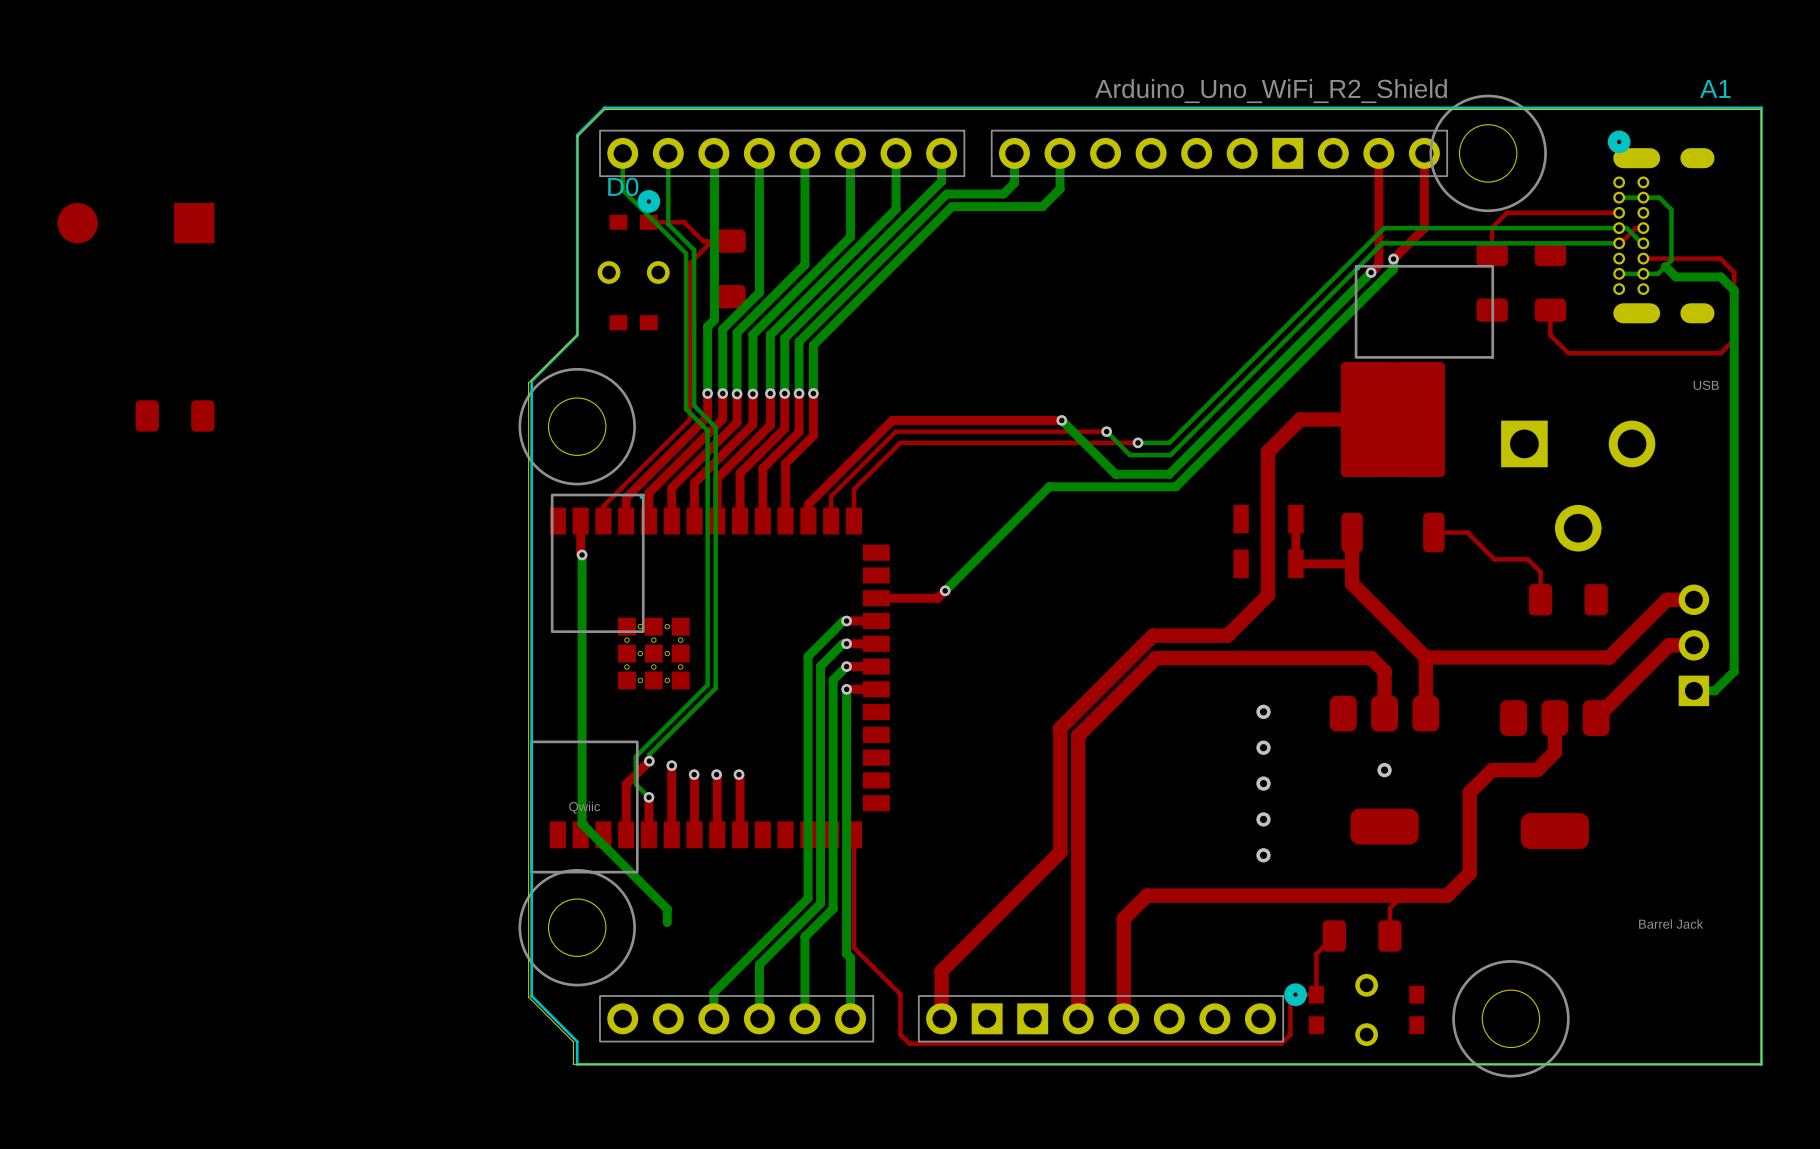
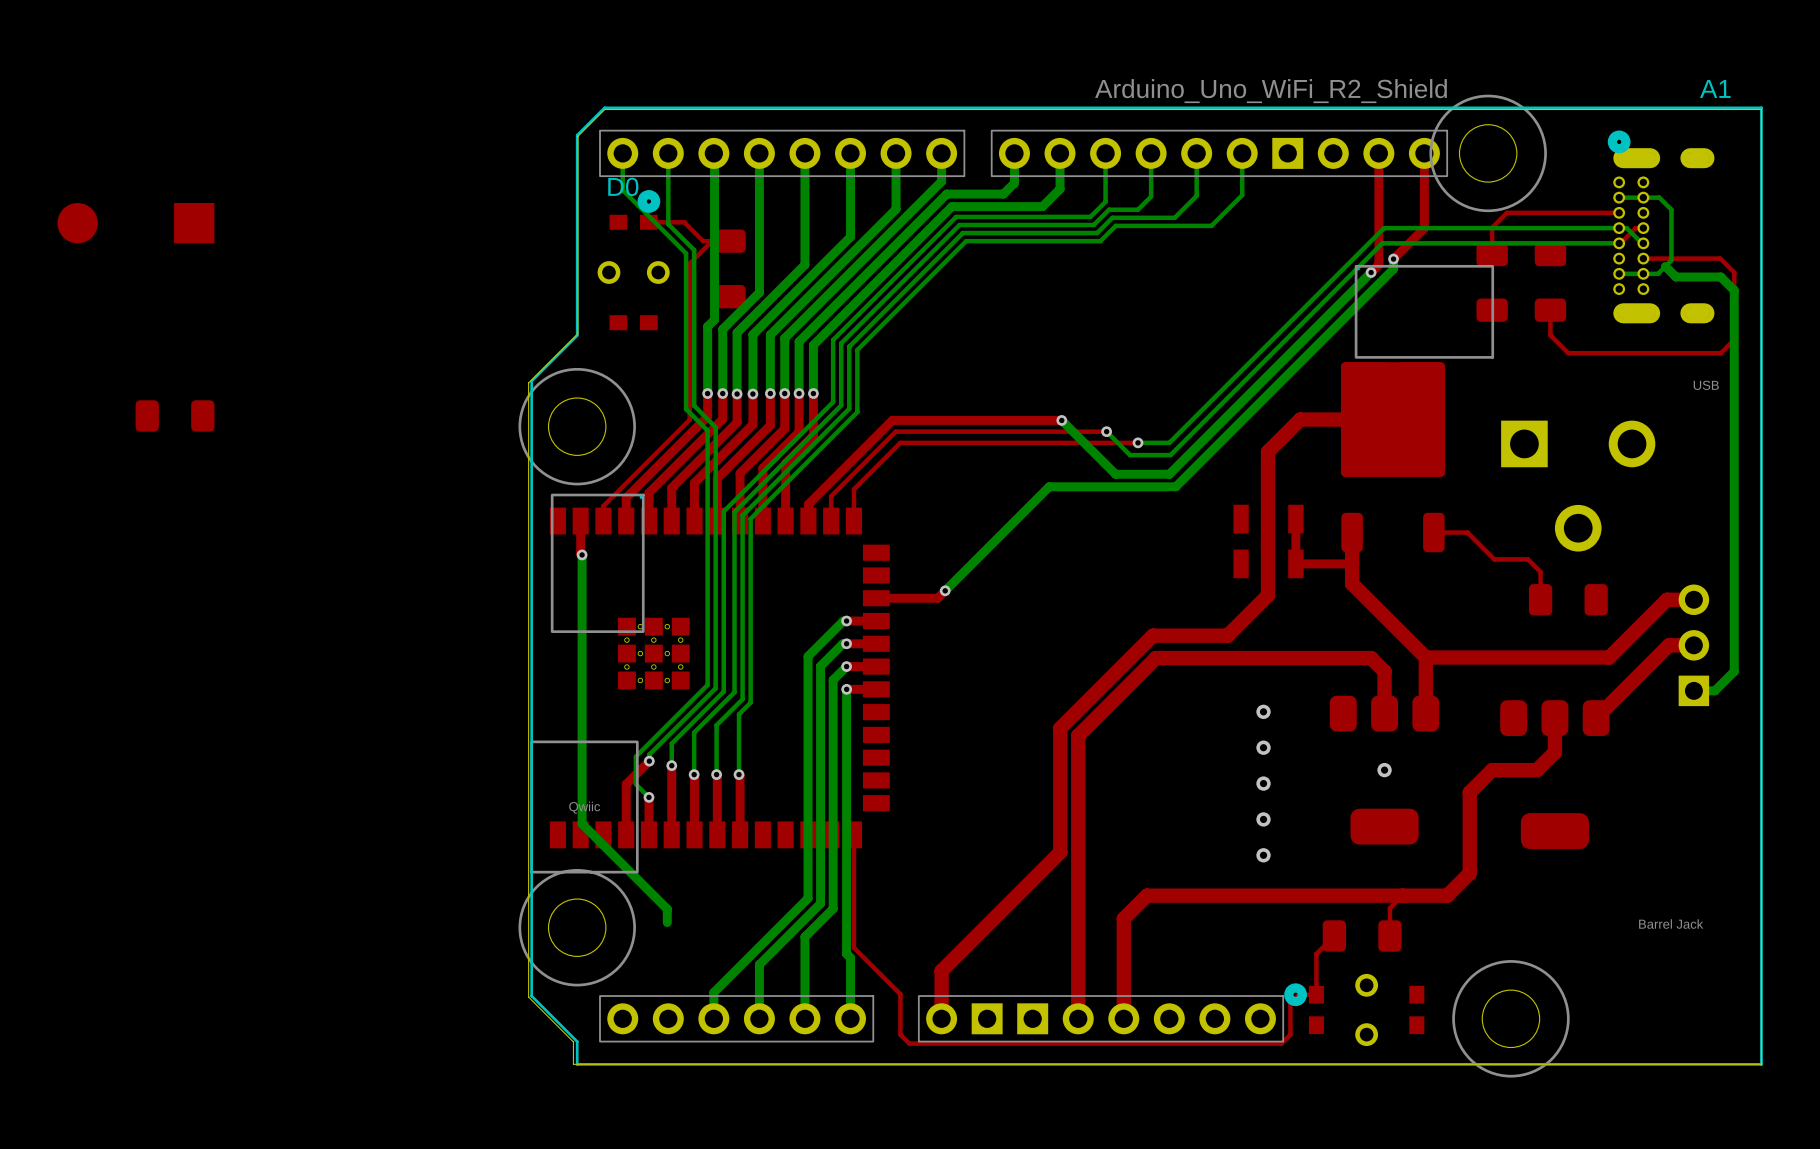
bottom track: none -> (1105, 153) (1105, 201) (1090, 216) (956, 216) (833, 339) (833, 402) (723, 511) (723, 691) (671, 743) (671, 765)
bottom track: none -> (1151, 153) (1151, 196) (1137, 209) (1109, 209) (1093, 224) (959, 224) (841, 343) (841, 405) (734, 512) (734, 692) (694, 732) (694, 774)
bottom track: none -> (1196, 153) (1196, 195) (1174, 217) (1112, 217) (1097, 233) (962, 233) (849, 346) (849, 408) (742, 515) (742, 699) (716, 725) (716, 774)
bottom track: none -> (1242, 153) (1242, 195) (1211, 225) (1115, 225) (1100, 241) (966, 241) (857, 350) (857, 412) (750, 518) (750, 702) (739, 714) (739, 774)

